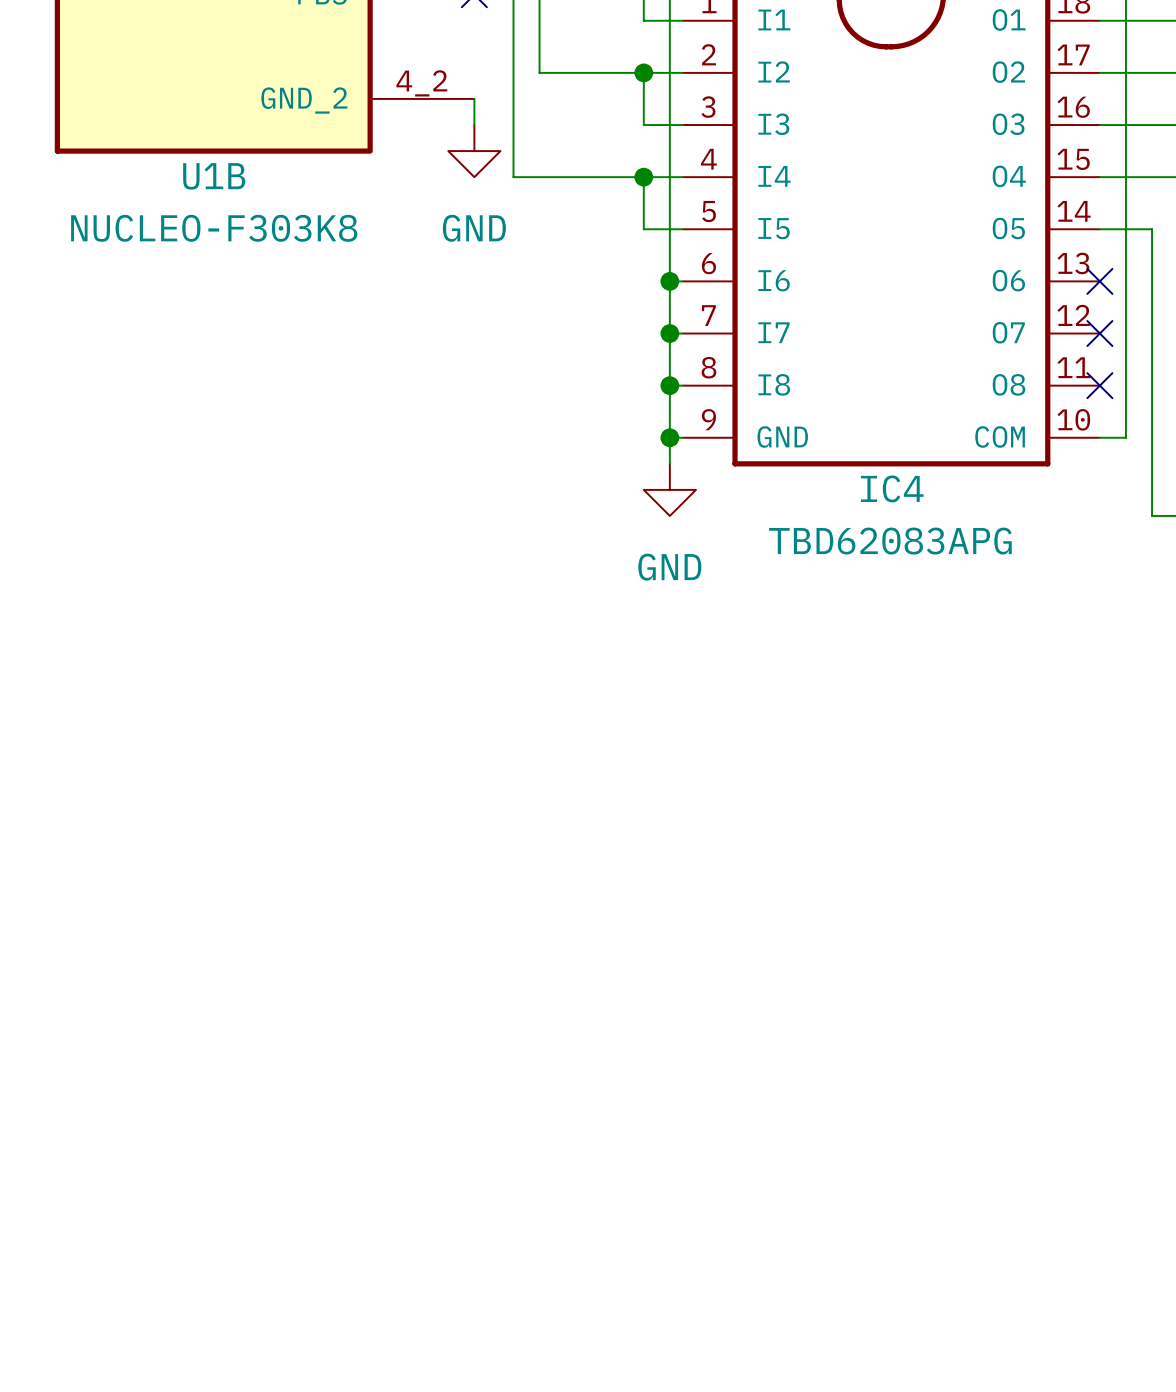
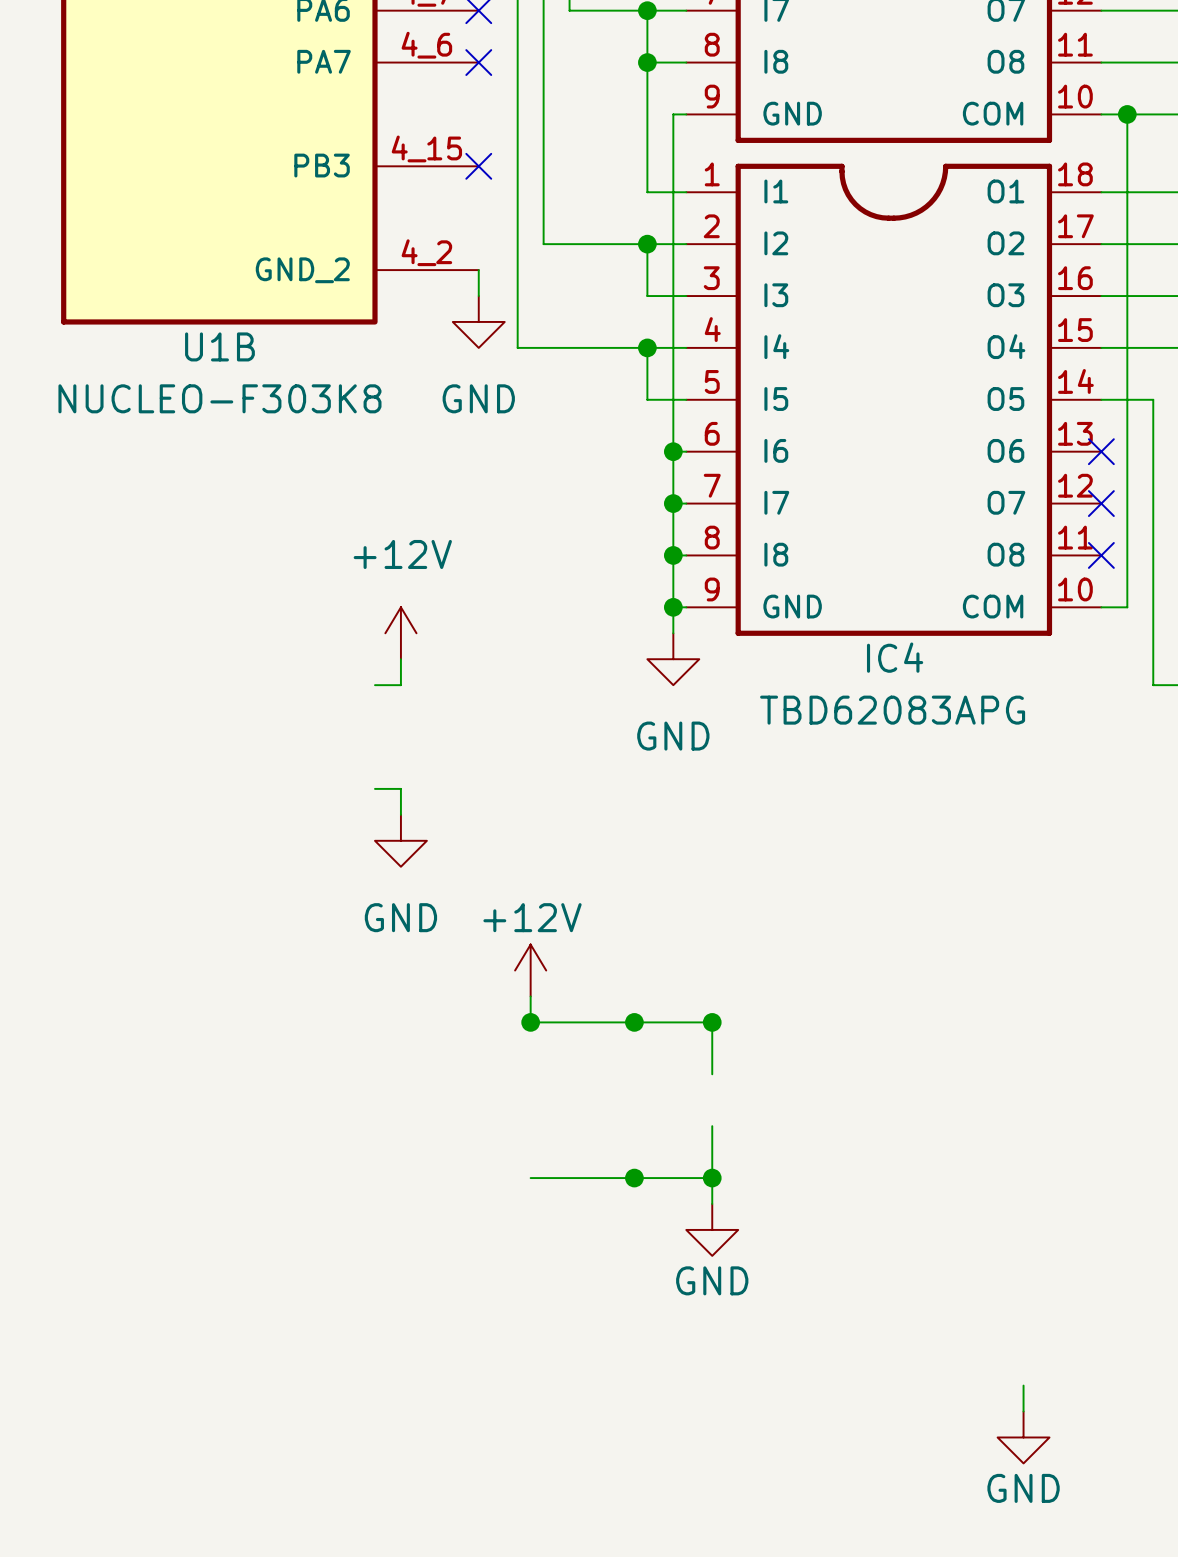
power symbol: none -> +12V (400, 633)
wire: none -> (400, 659) (400, 685) (375, 685)
wire: none -> (375, 788) (400, 788) (400, 814)
power symbol: none -> GND (400, 840)
power symbol: none -> +12V (530, 970)
wire: none -> (530, 996) (530, 1022) (712, 1022) (712, 1074)
junction: none -> (530, 1022)
junction: none -> (634, 1022)
junction: none -> (712, 1022)
wire: none -> (712, 1126) (712, 1203)
wire: none -> (530, 1178) (712, 1178)
junction: none -> (634, 1178)
junction: none -> (712, 1178)
power symbol: none -> GND (712, 1229)
wire: none -> (1023, 1385) (1023, 1411)
power symbol: none -> GND (1023, 1437)

